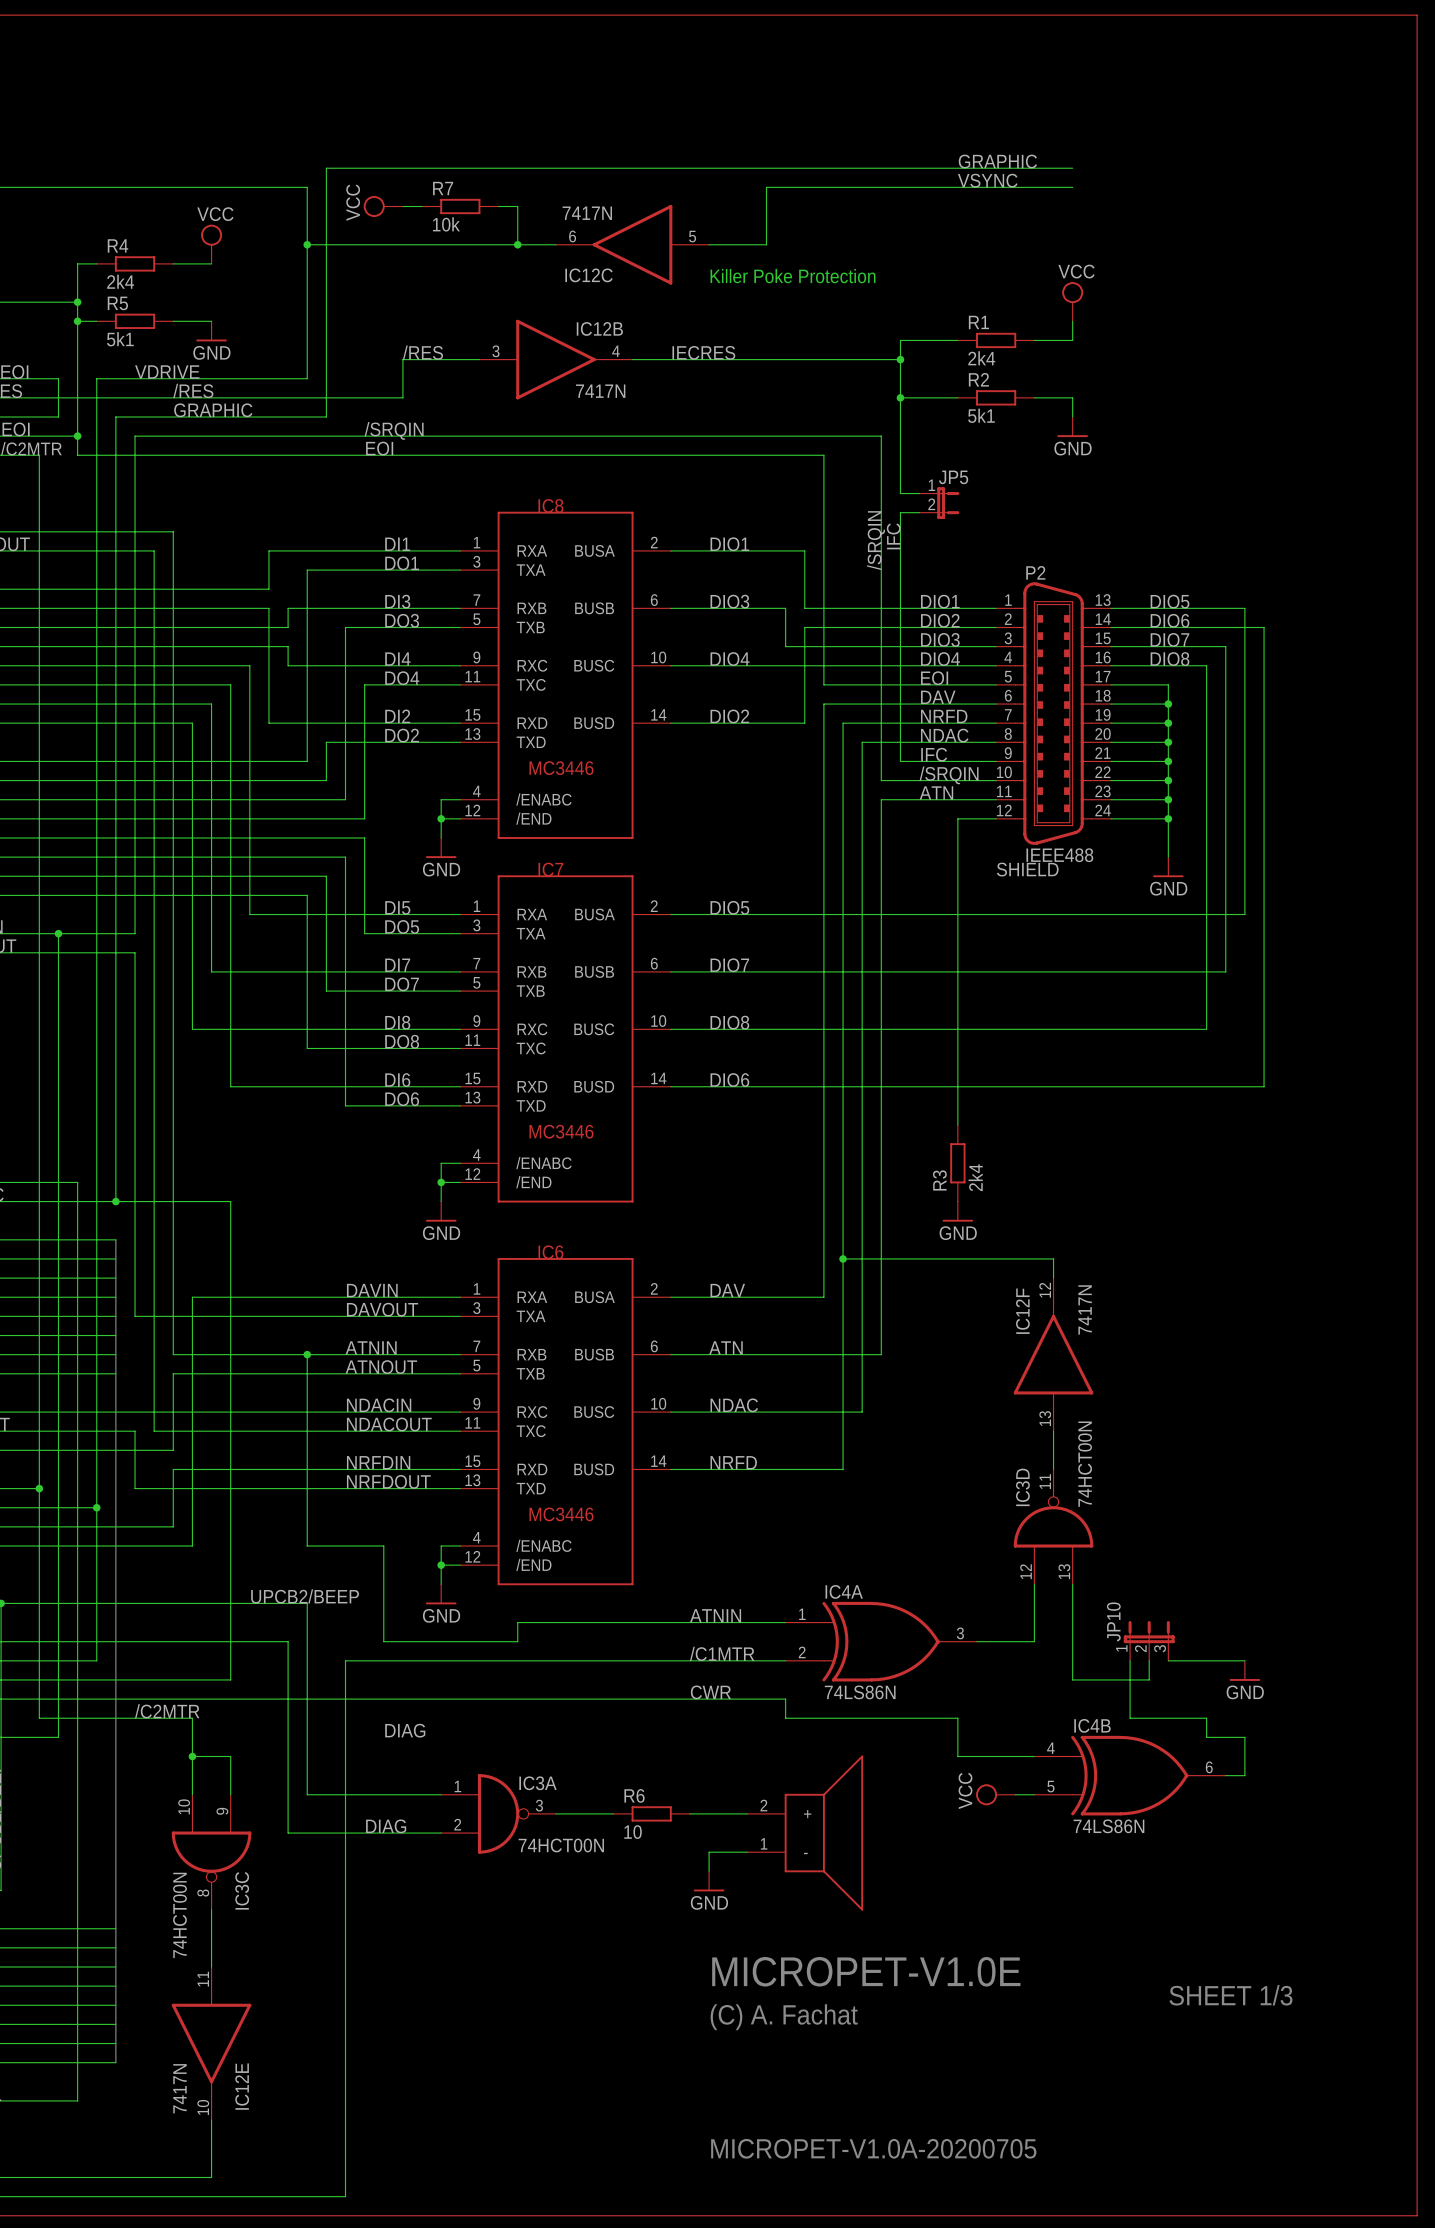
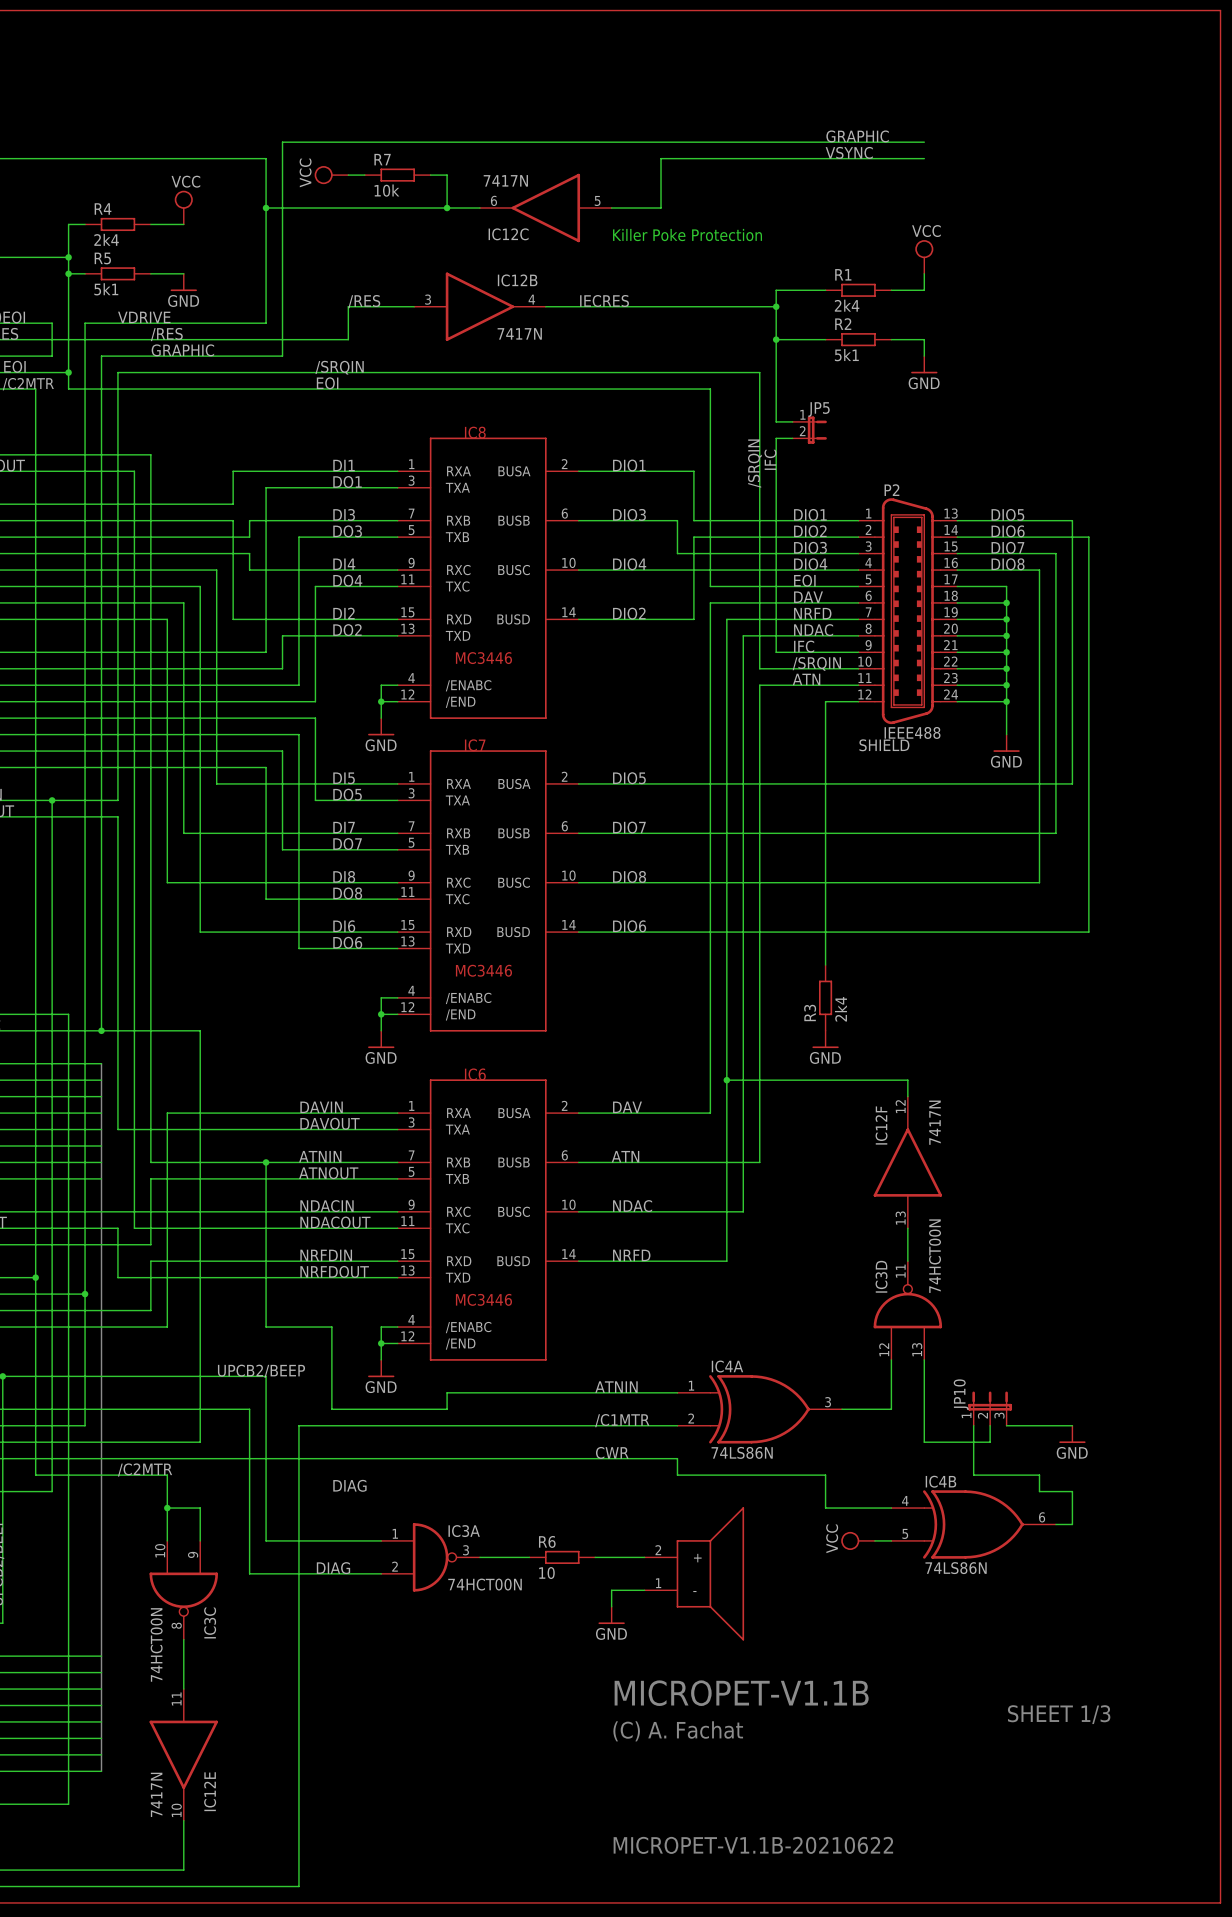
text: MICROPET-V1.0E (866, 1971) -> MICROPET-V1.1B (741, 1693)
text: MICROPET-V1.0A-20200705 (873, 2148) -> MICROPET-V1.1B-20210622 (753, 1845)

